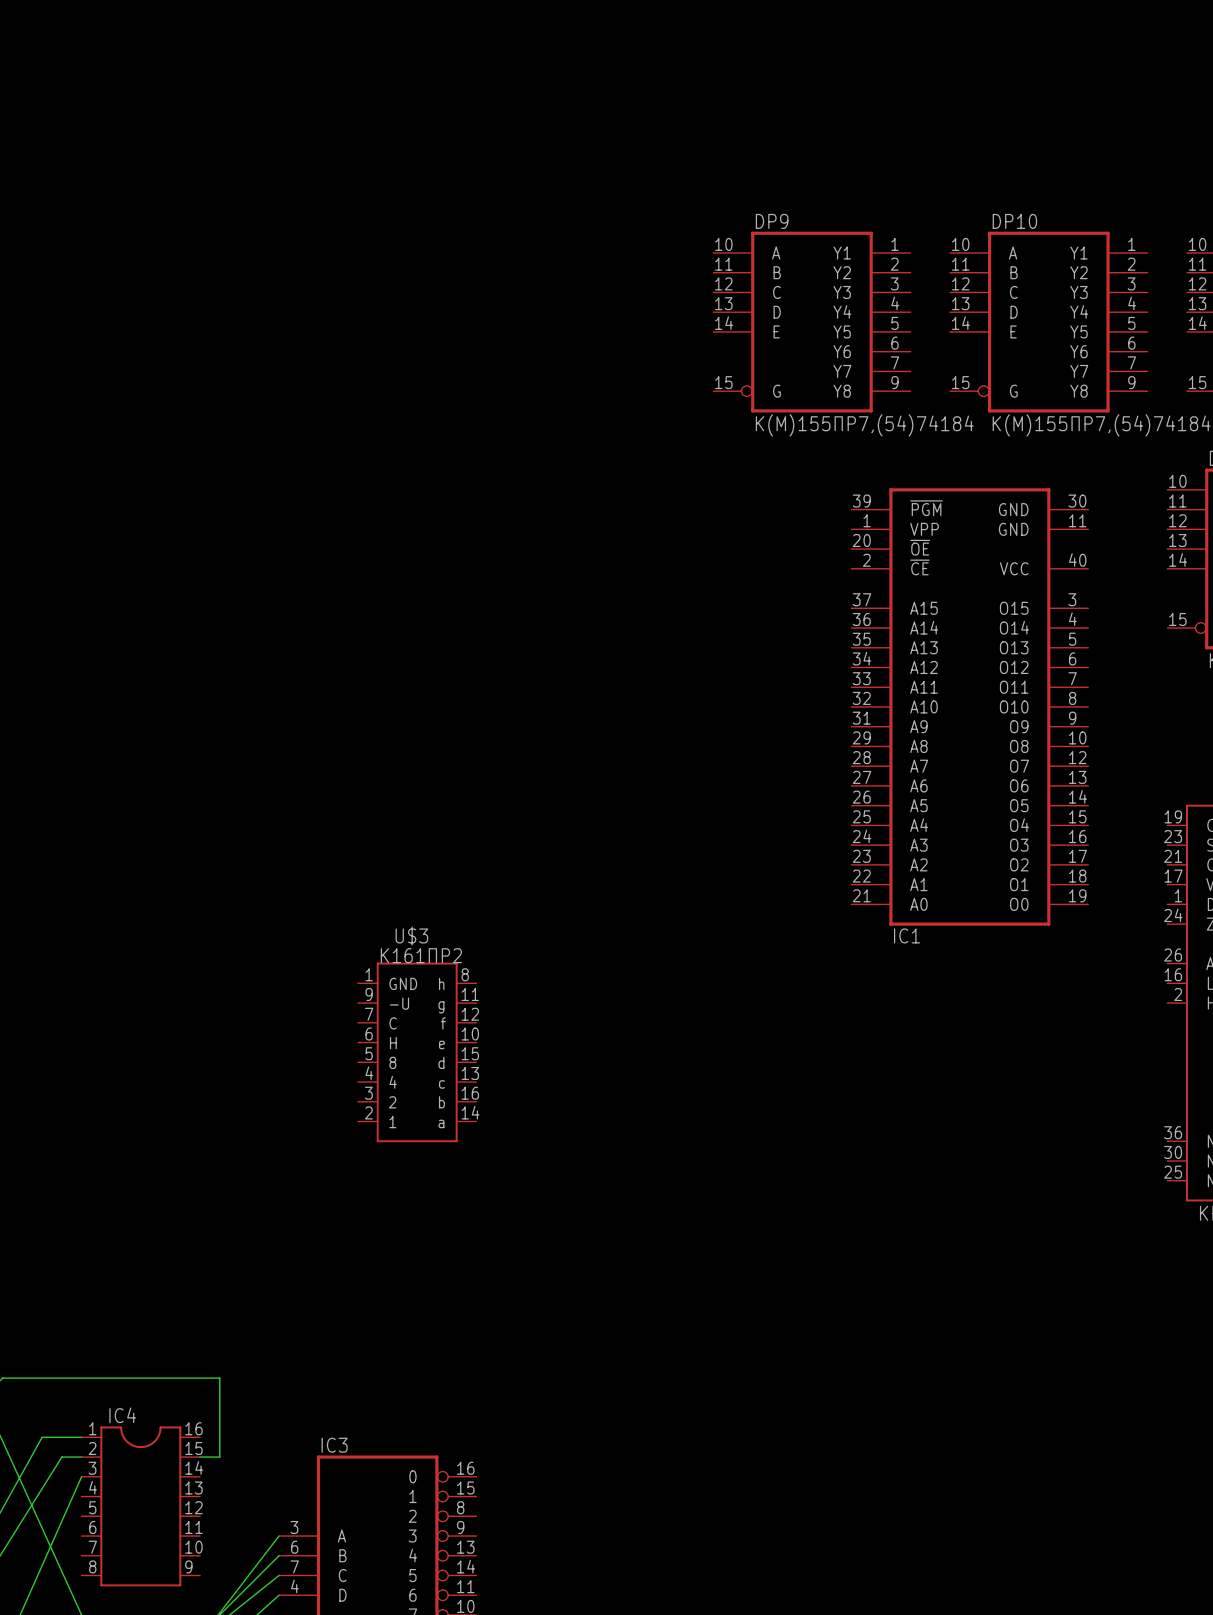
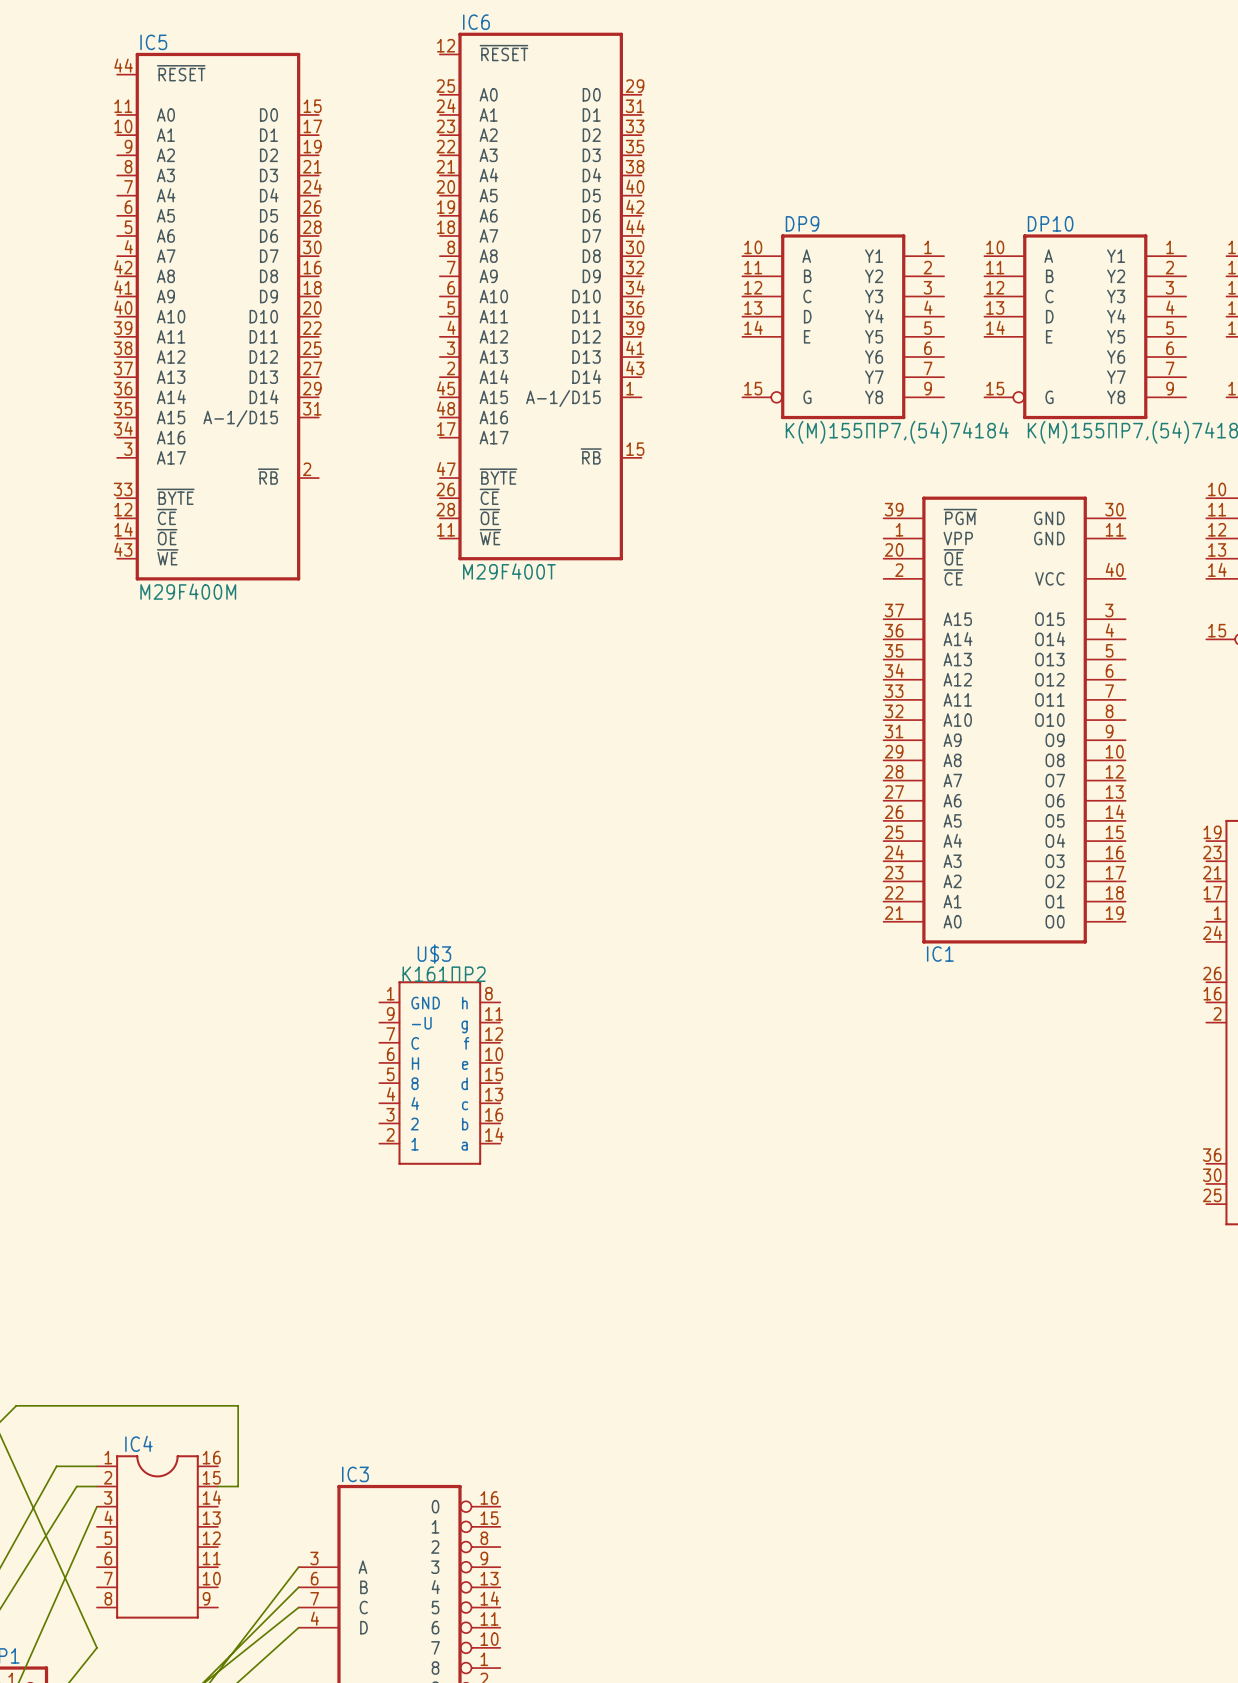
IC6: none -> M29F400T (540, 296)
IC5: none -> M29F400M (217, 316)

